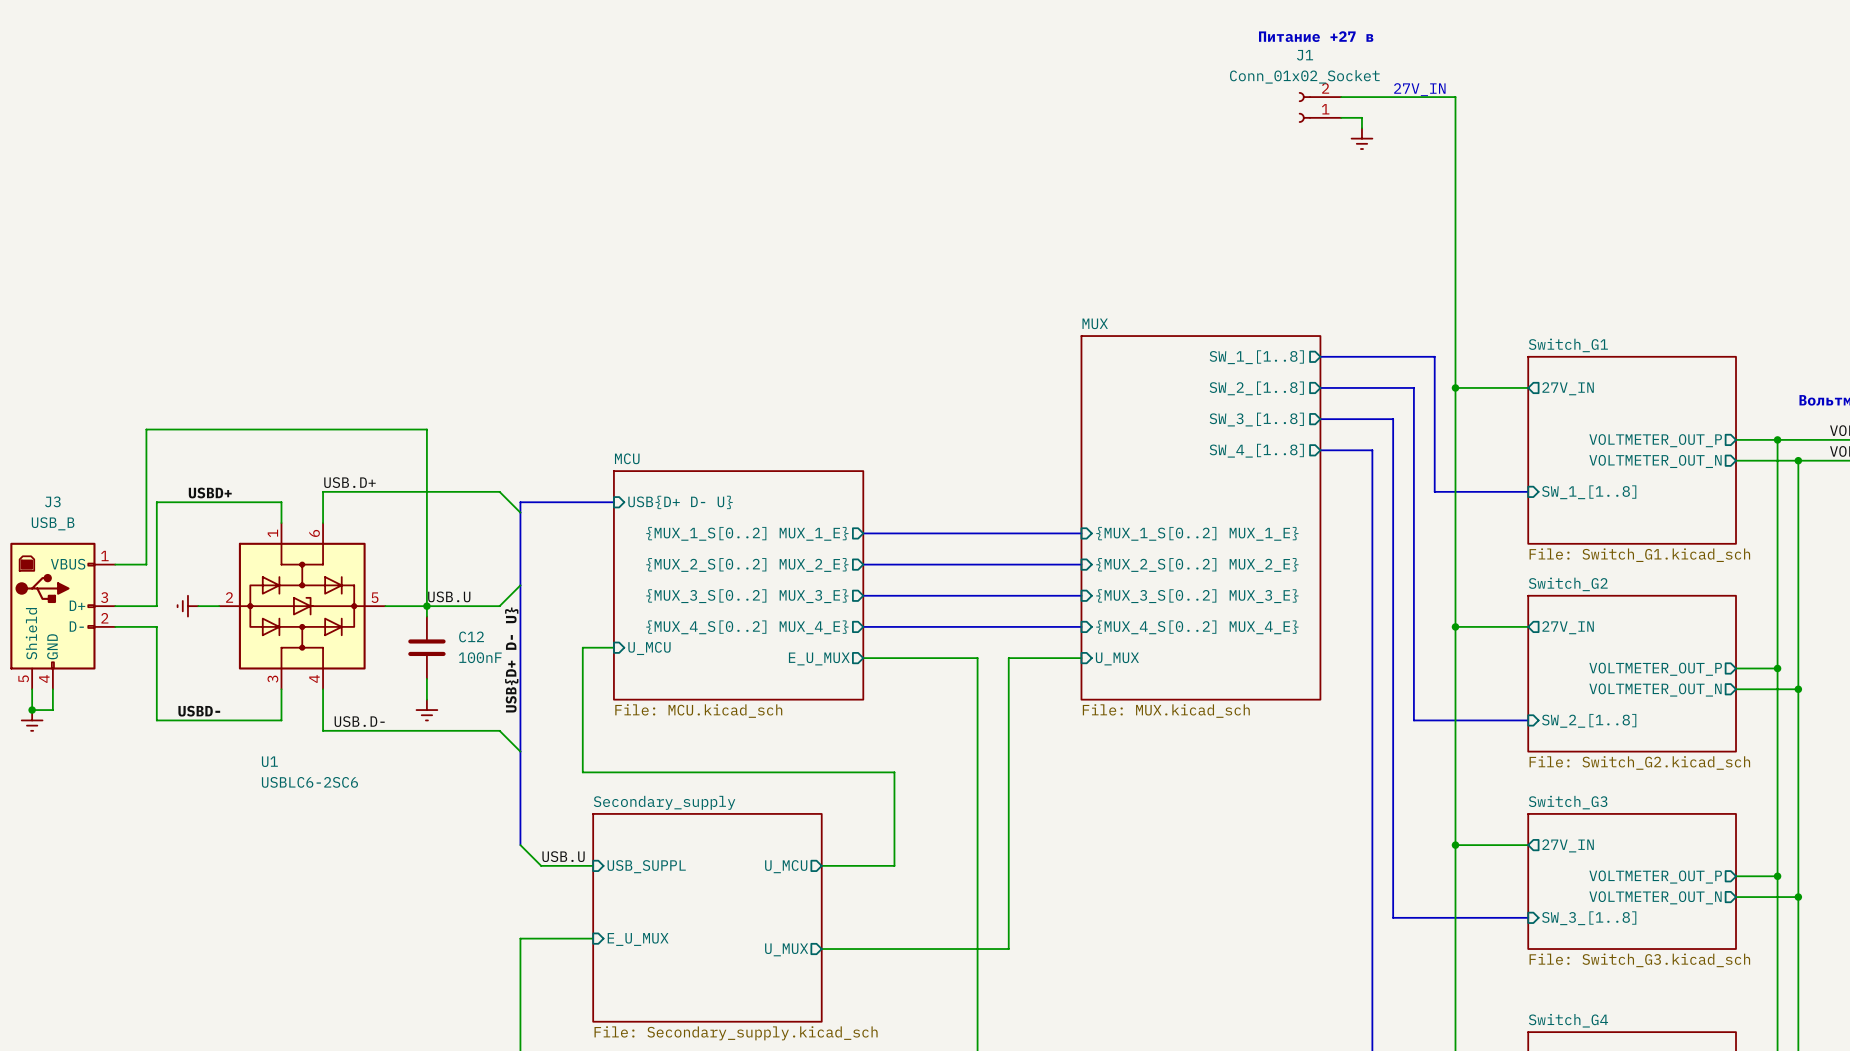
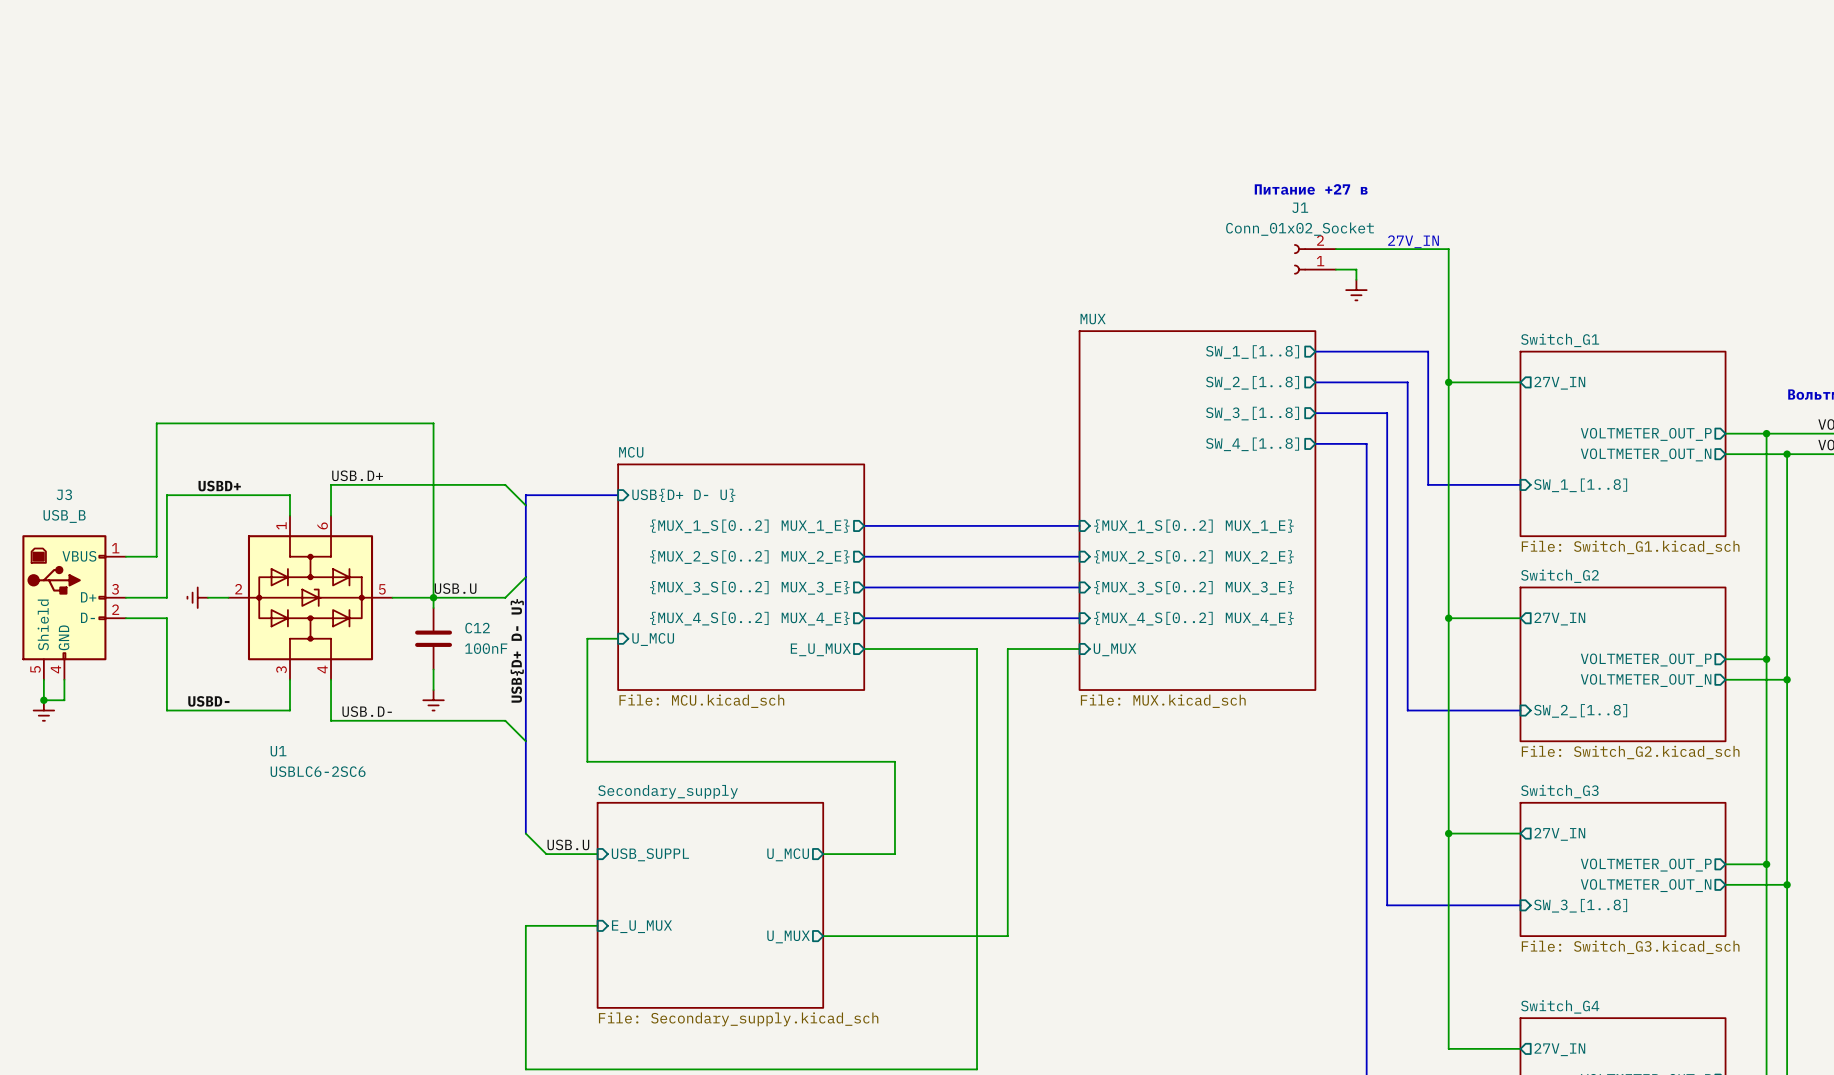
text position: Питание +27 в (1316, 36) -> Питание +27 в (1311, 189)
text position: 27V_IN (1419, 89) -> 27V_IN (1413, 241)
wire: (1341, 97) (1455, 97) (1455, 252) -> (1335, 249) (1448, 249)
J1 position: (1320, 107) -> (1315, 259)
wire: (1341, 117) (1361, 117) (1361, 128) -> (1335, 269) (1356, 269) (1356, 279)
power symbol position: (1361, 138) -> (1356, 290)

